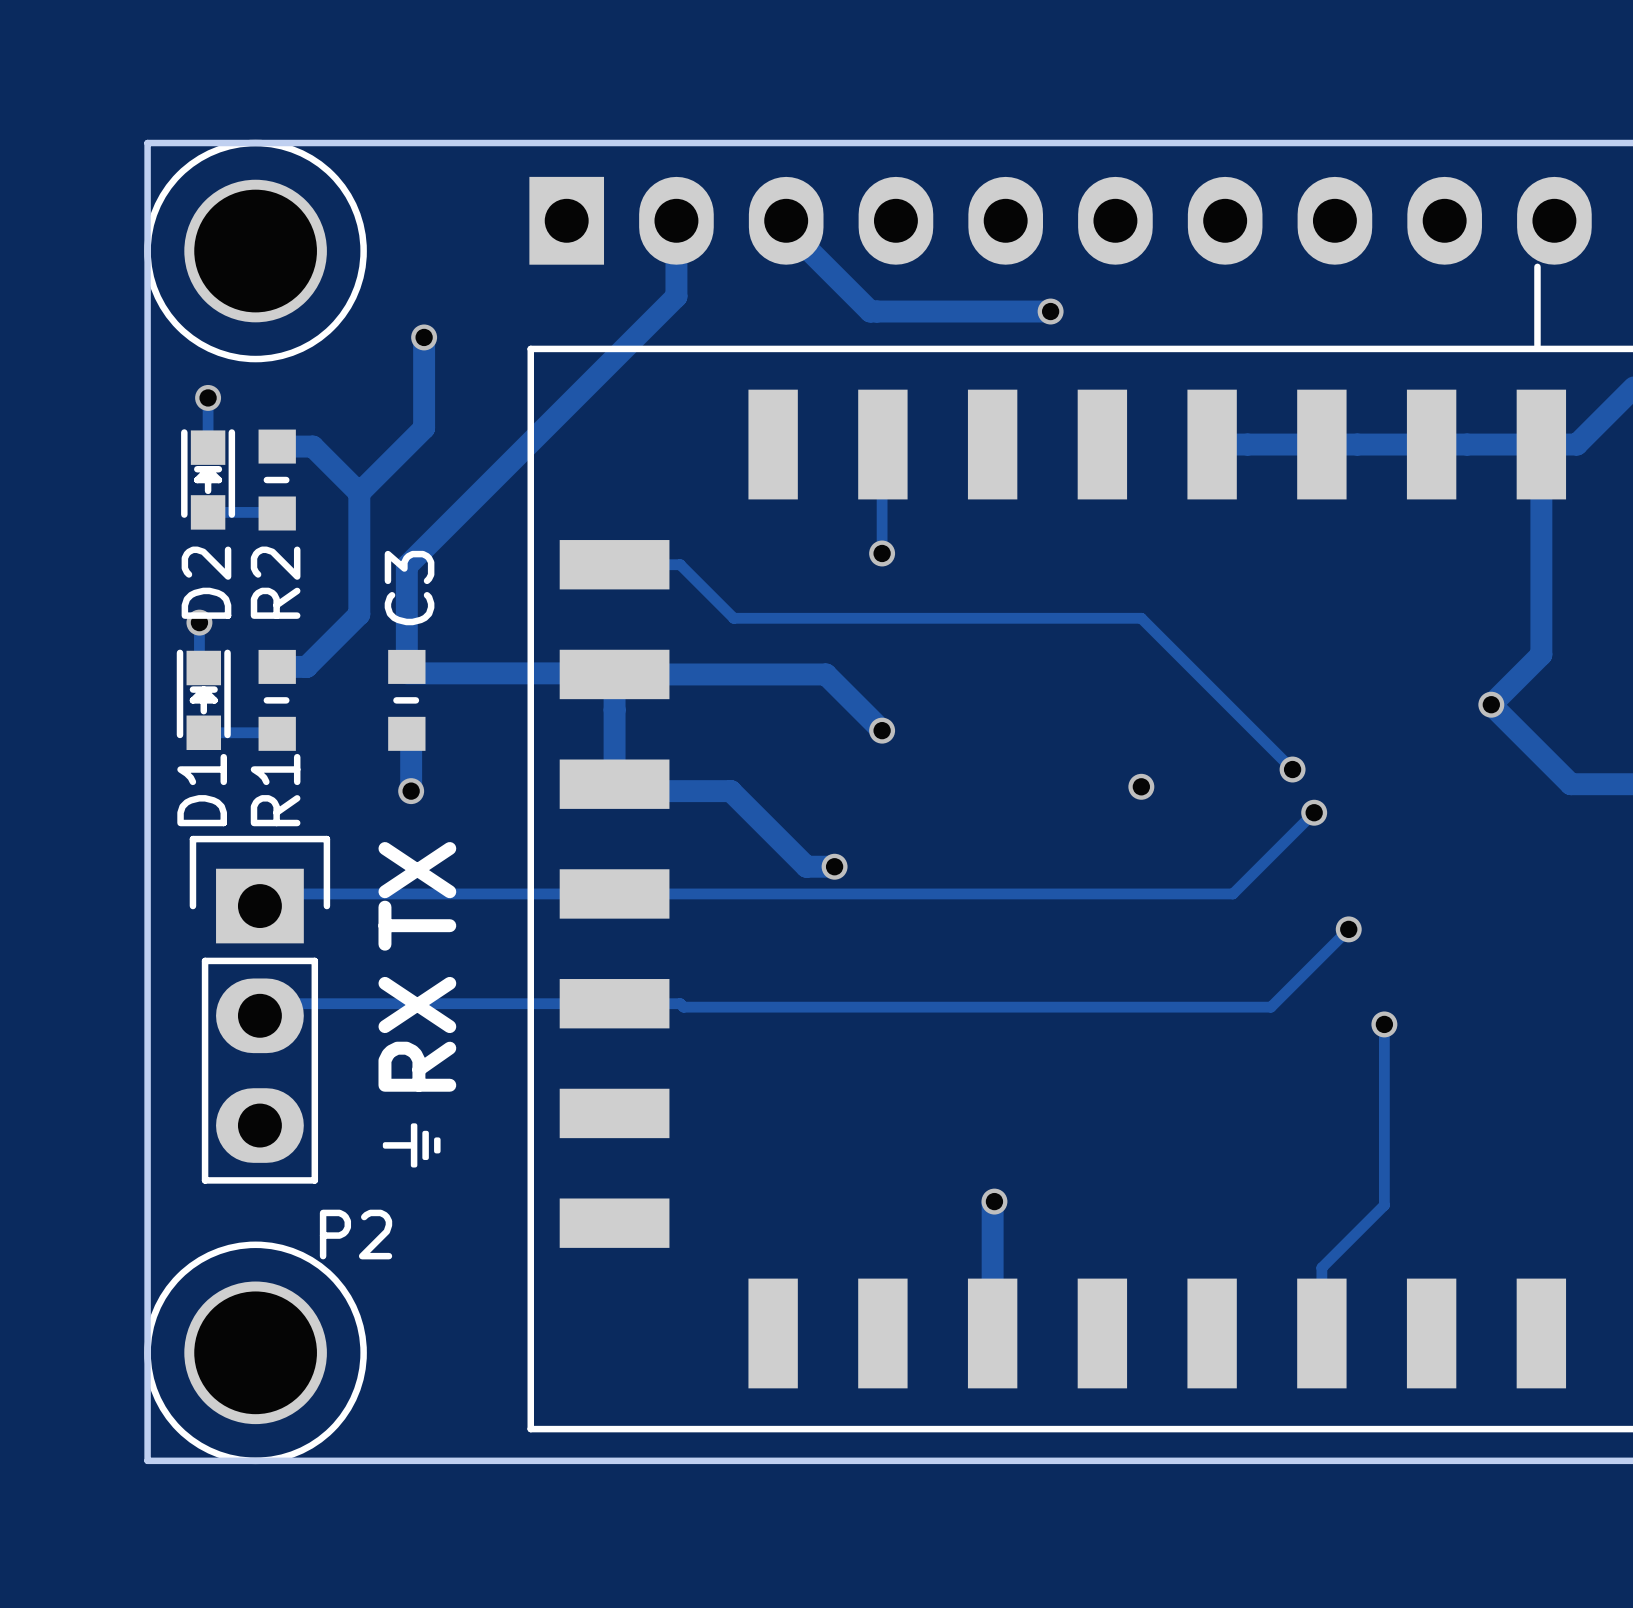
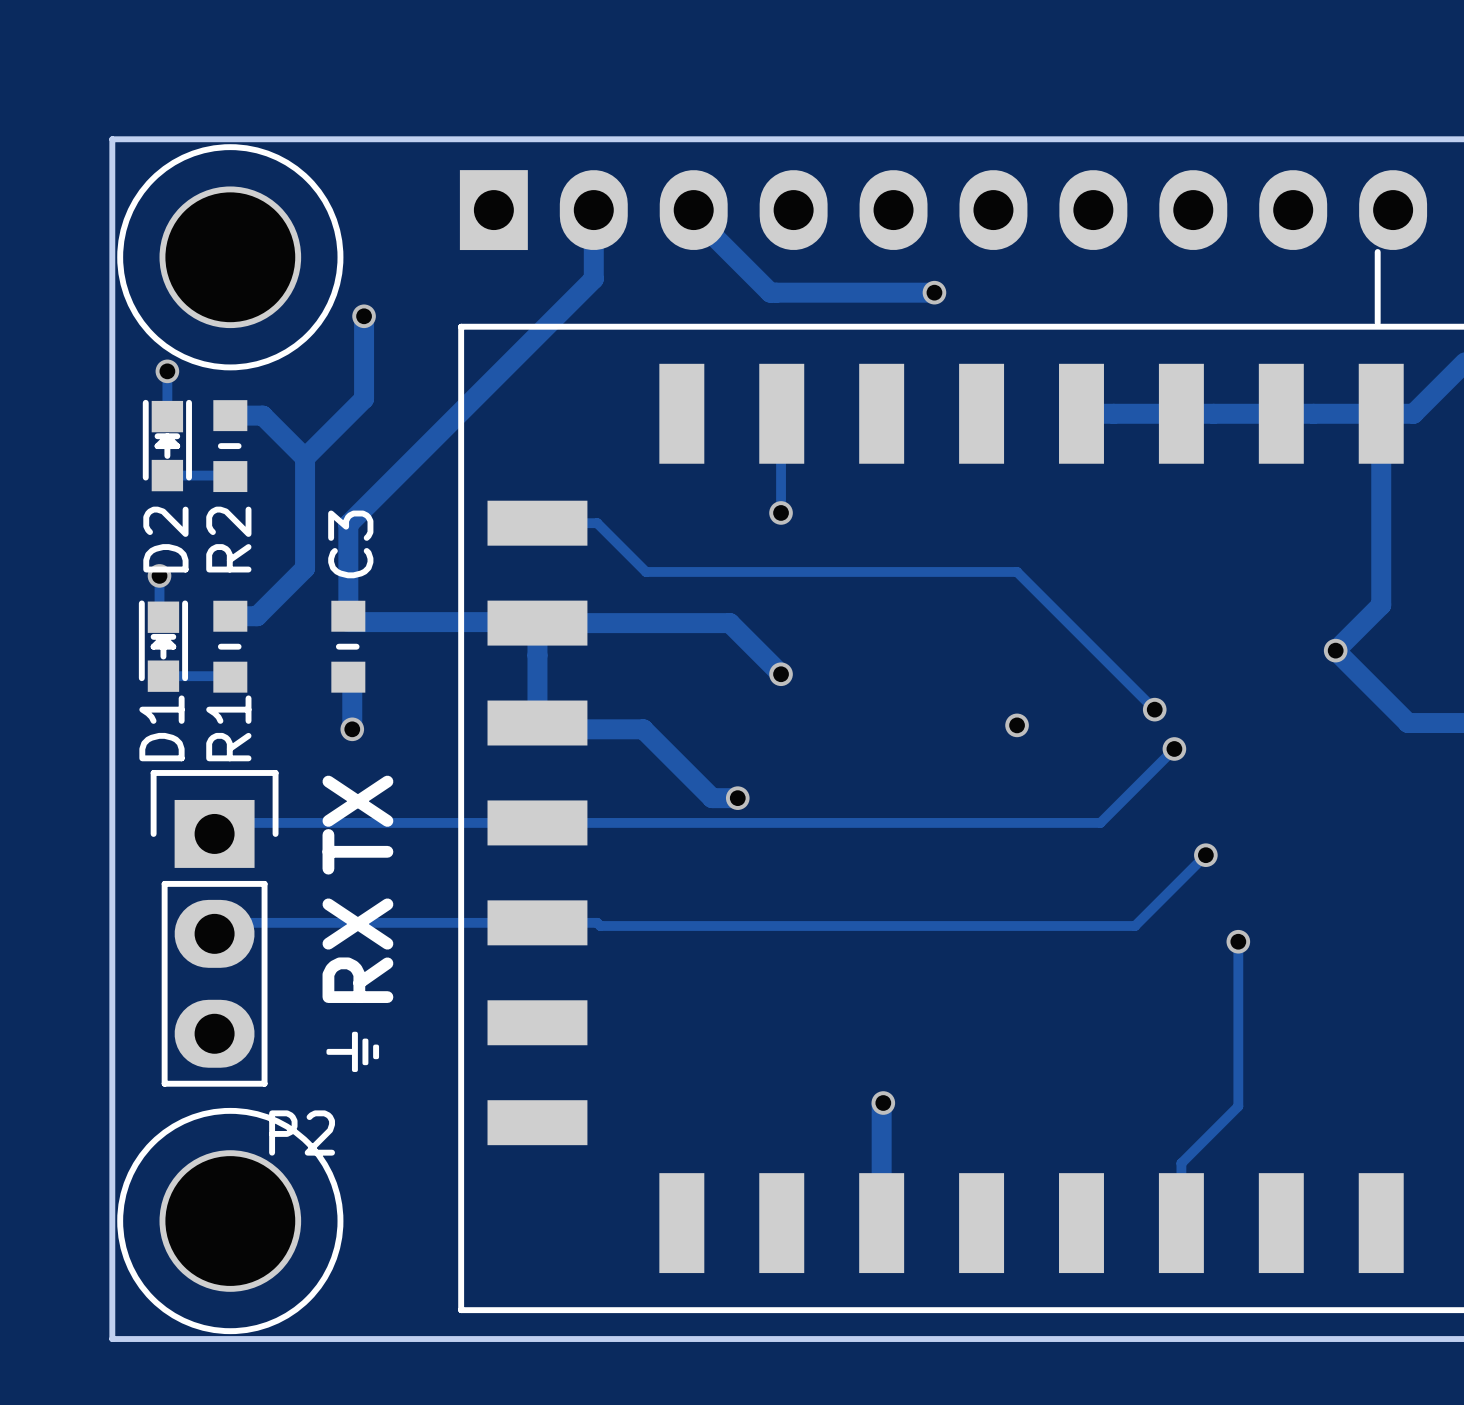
part footprint: [144, 139, 367, 363] -> [117, 144, 344, 371]
part footprint: [144, 1241, 367, 1465] -> [117, 1107, 344, 1335]

